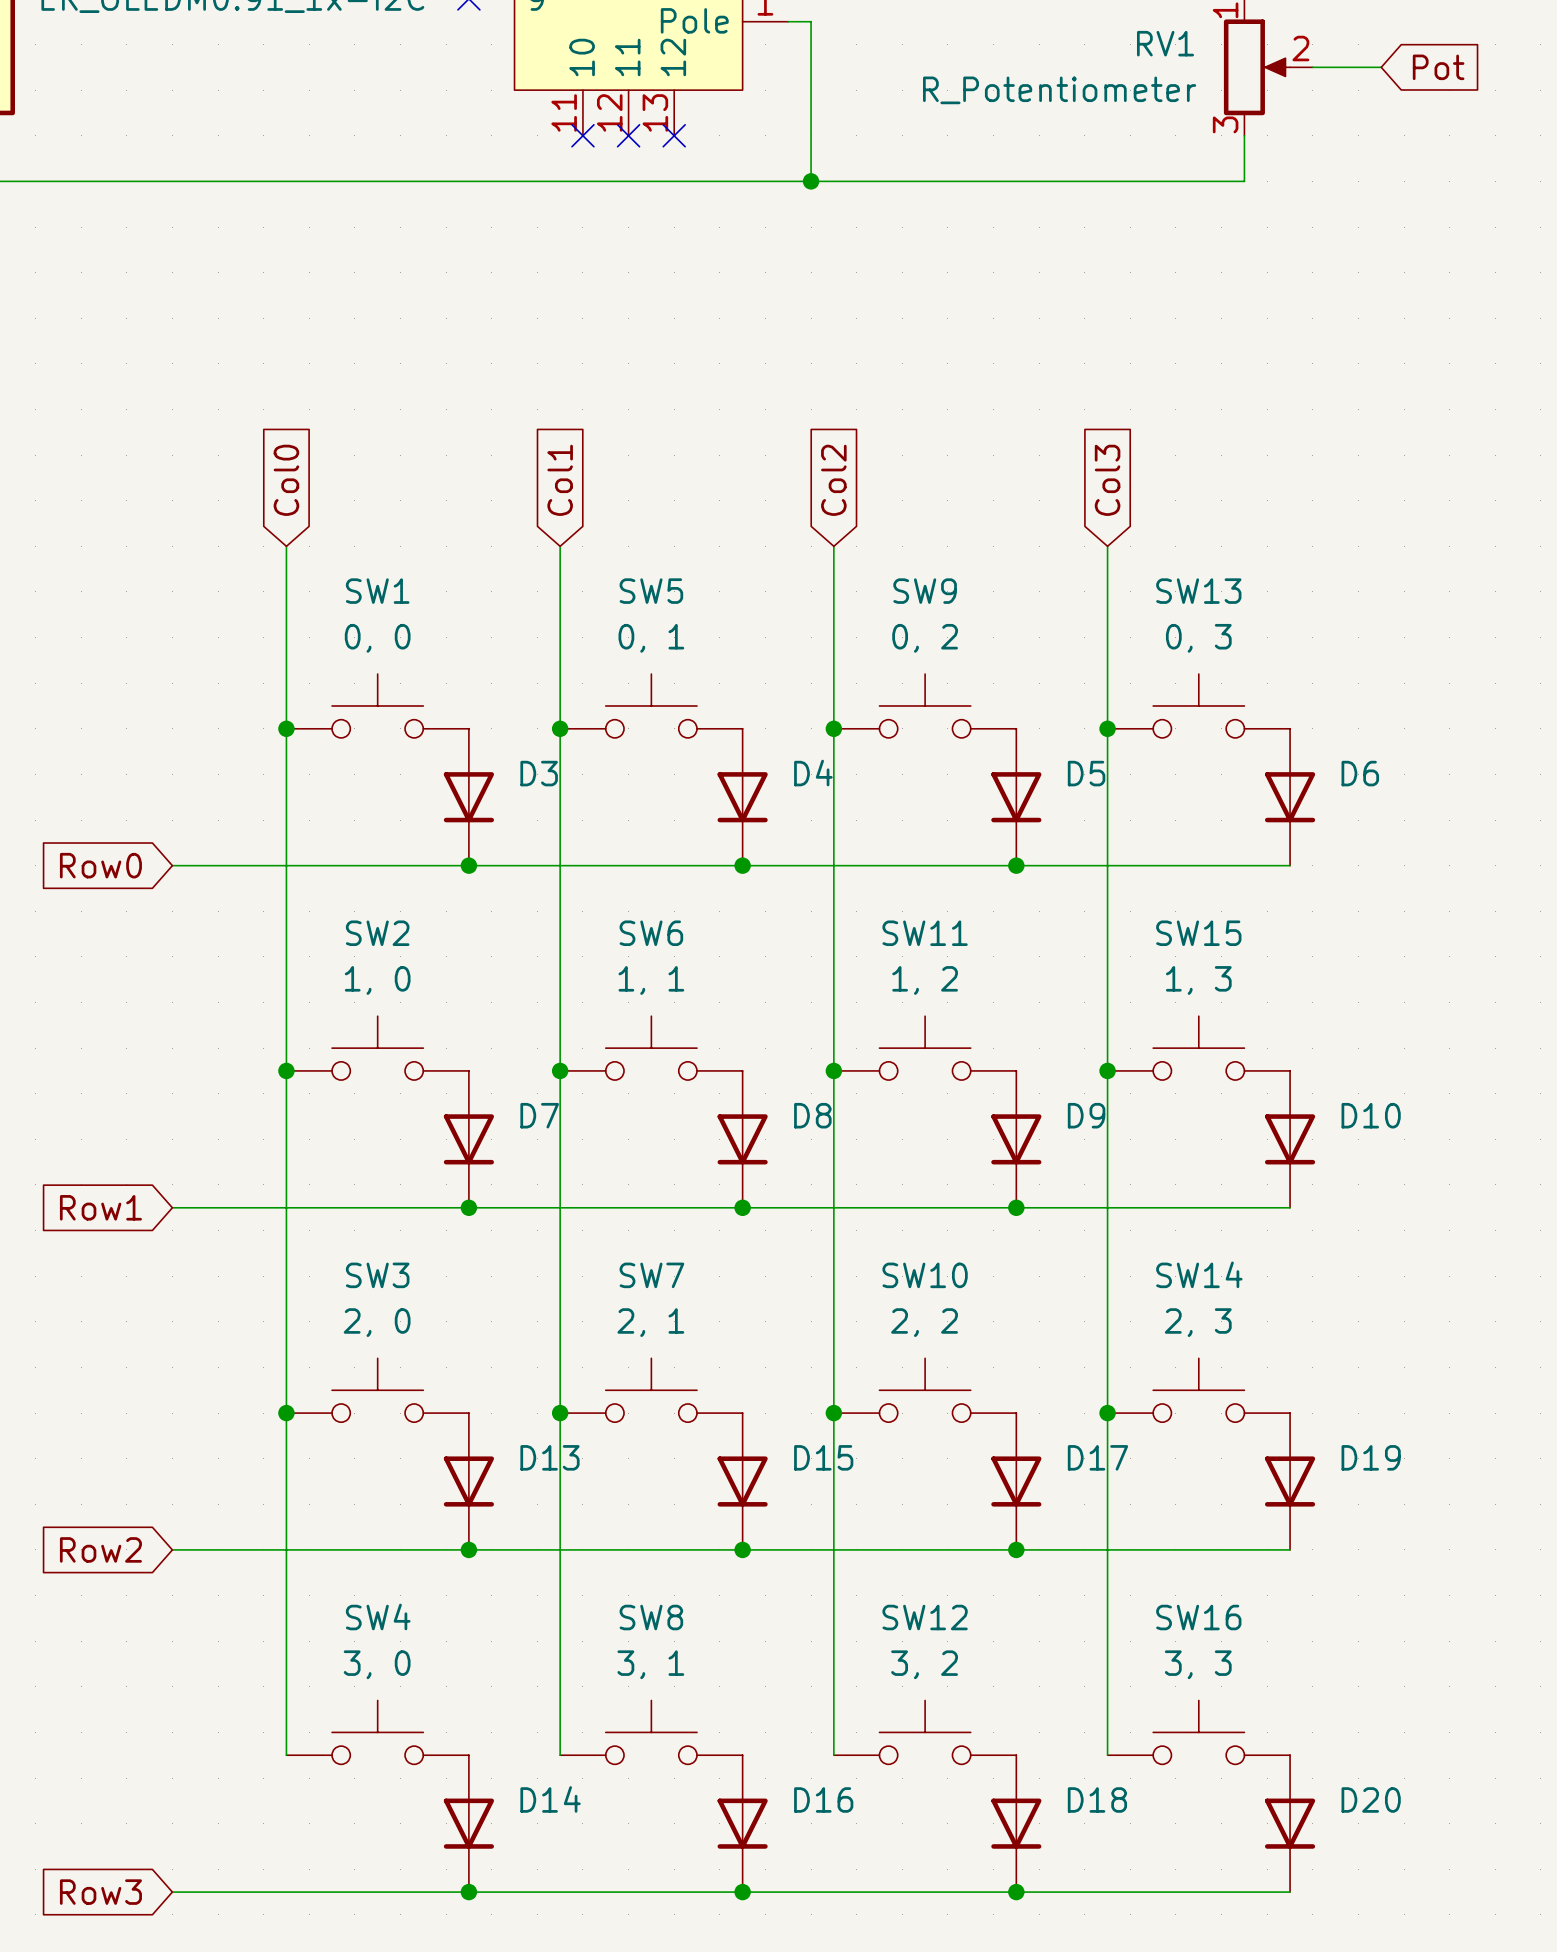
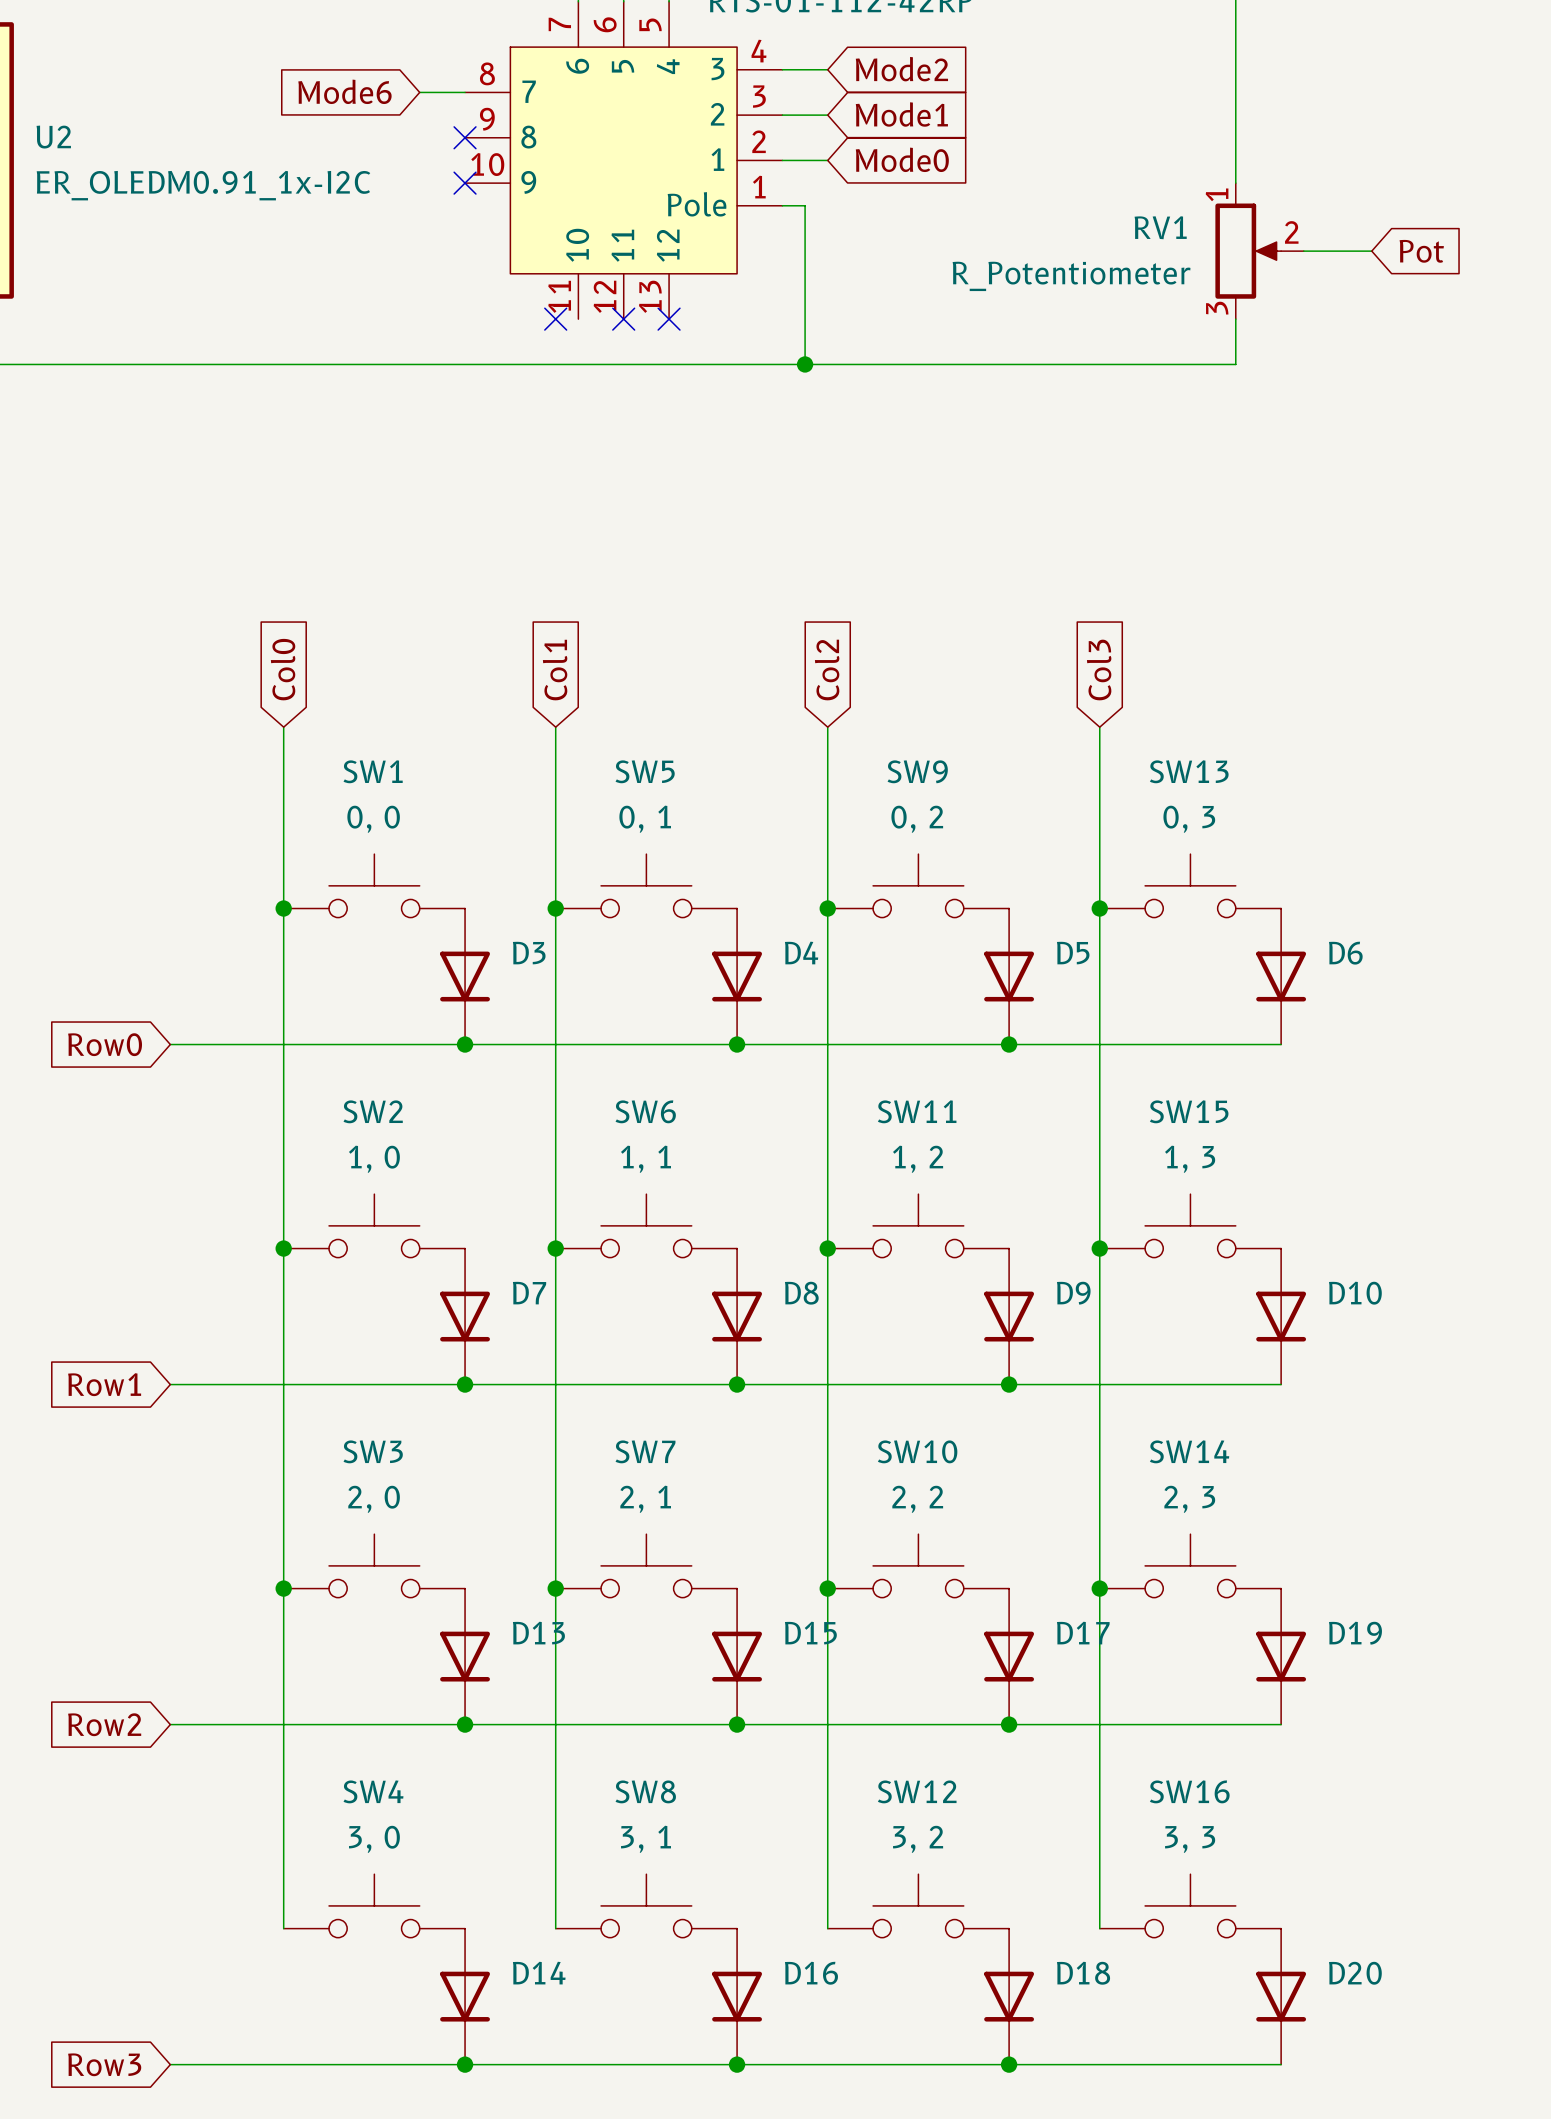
no-connect mark position: (582, 135) -> (555, 319)

